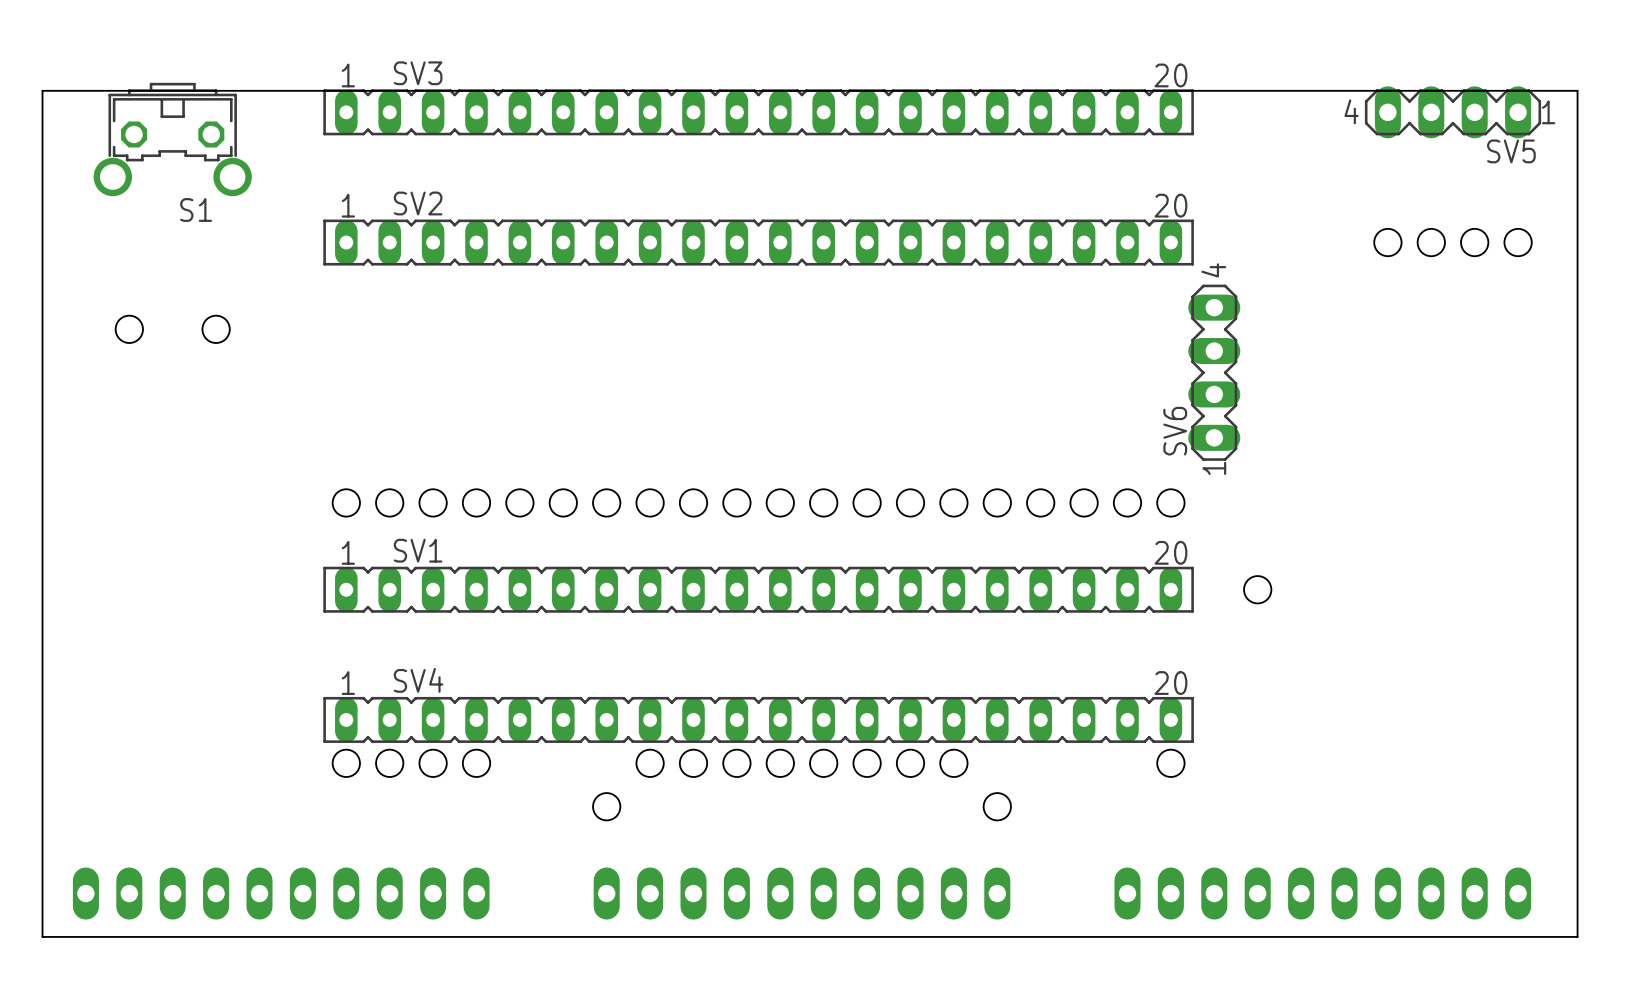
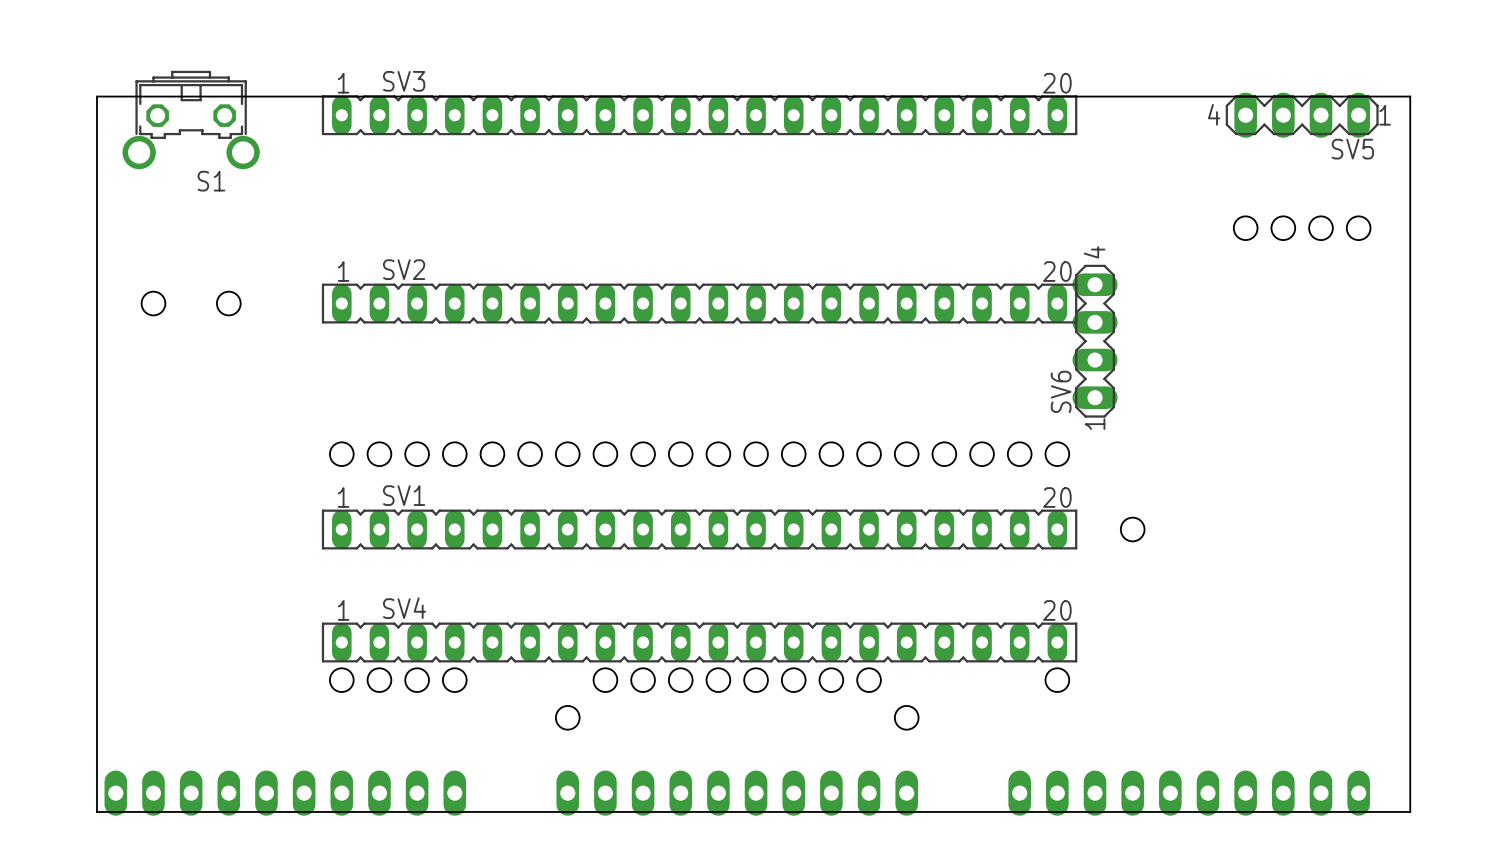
board edge: (64, 90) (42, 90) (42, 936) (1577, 936) (1577, 915) -> (96, 96) (96, 811) (1410, 811)
S1 position: (172, 139) -> (191, 119)
SV2 position: (758, 242) -> (699, 303)

